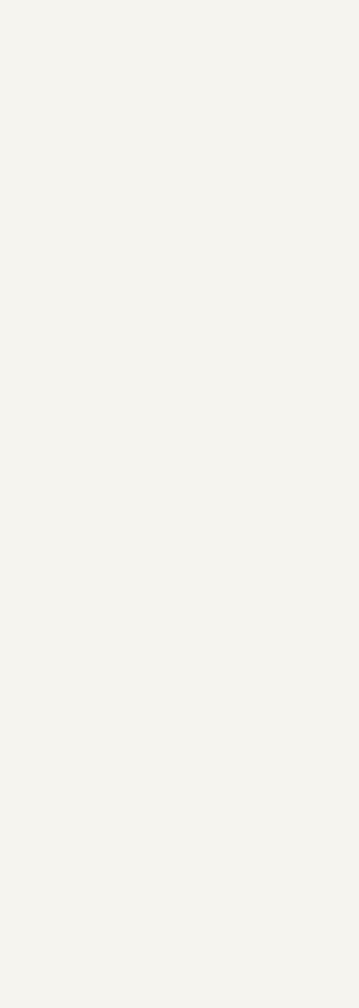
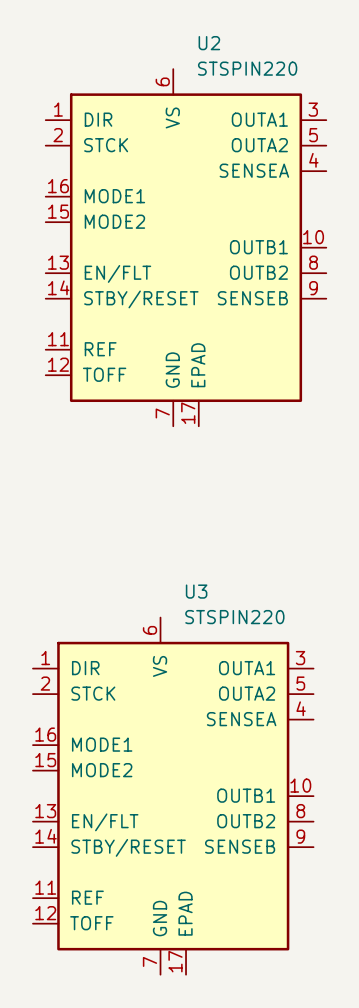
U2: none -> STSPIN220 (186, 247)
U3: none -> STSPIN220 (173, 796)

